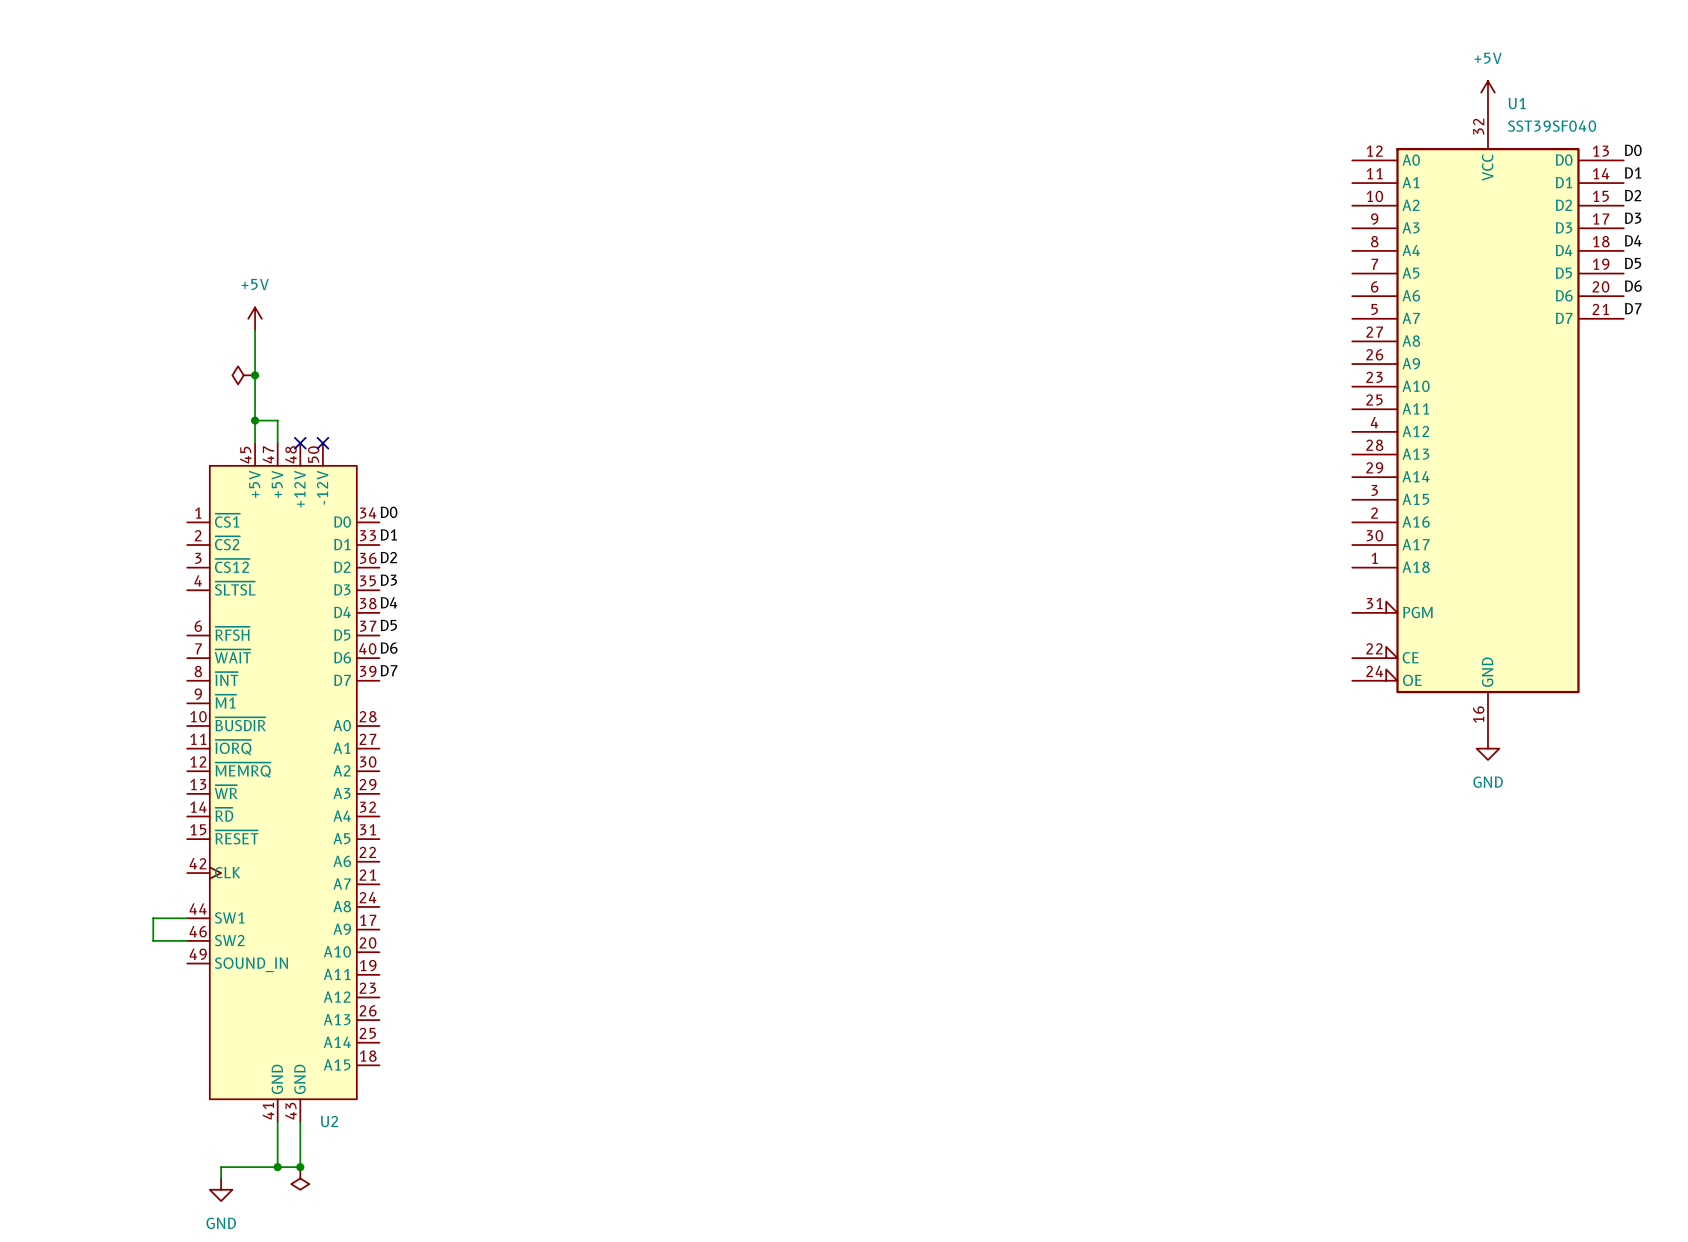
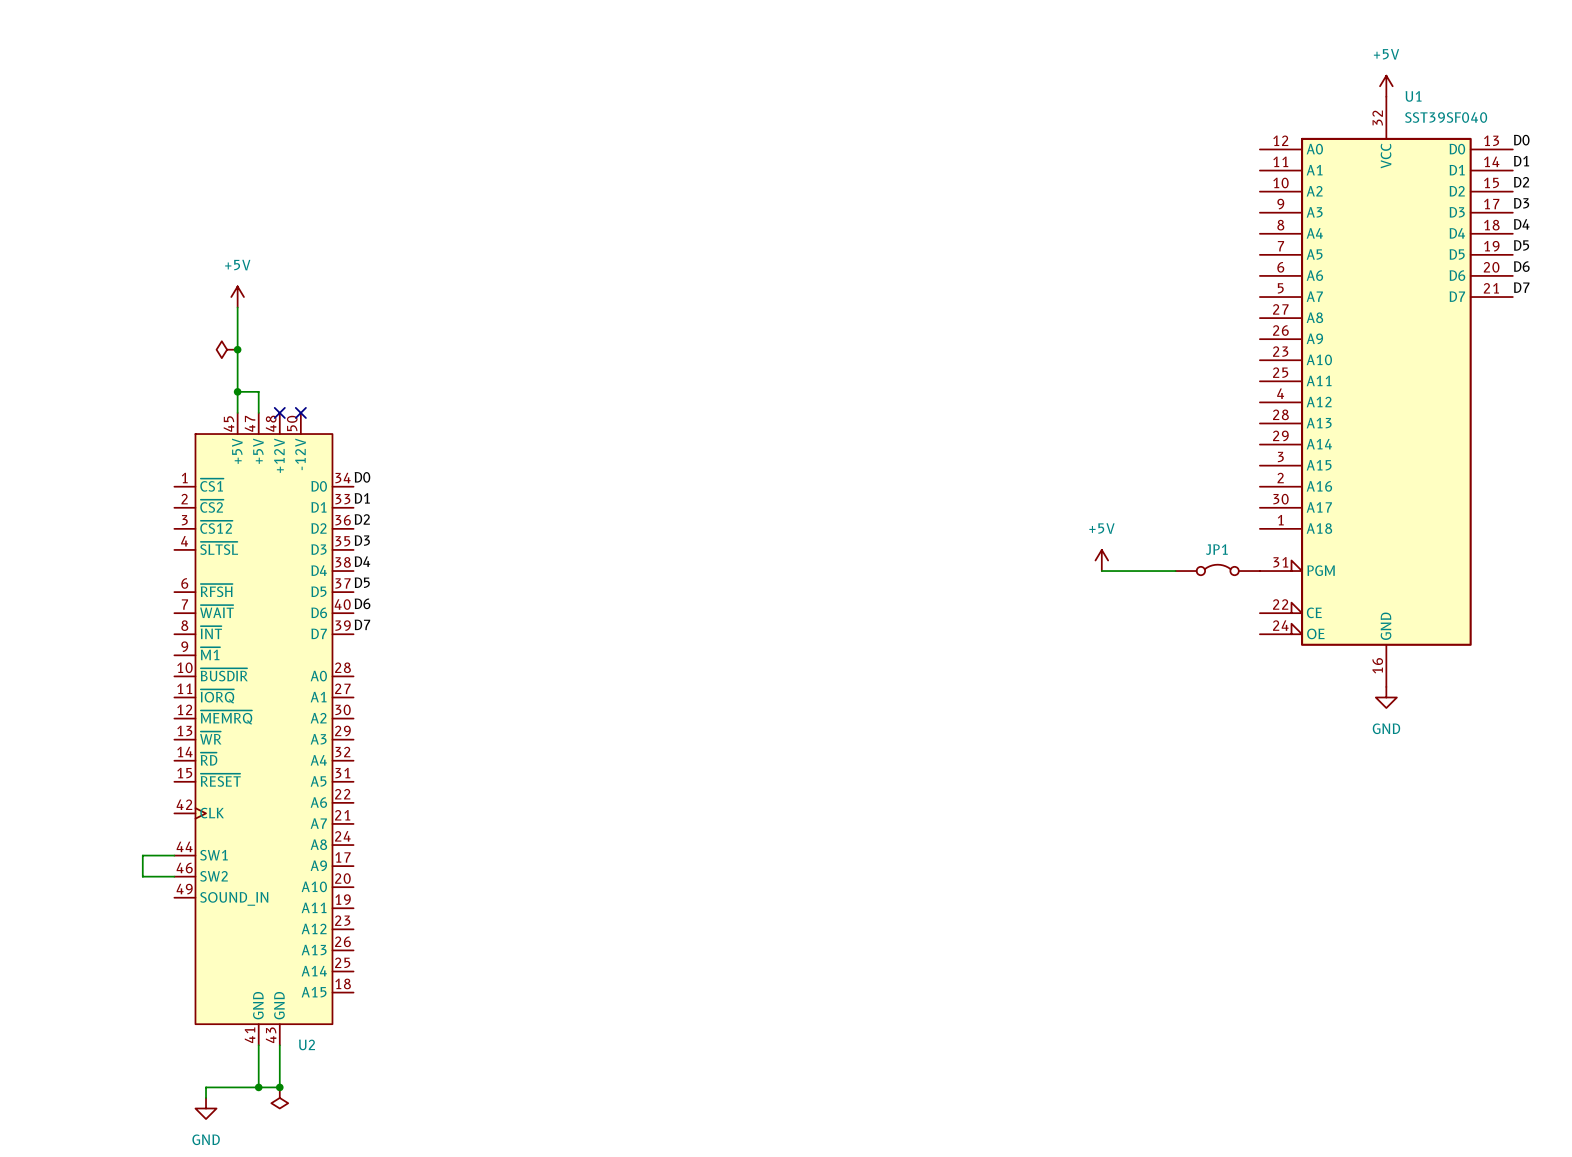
power symbol: none -> +5V (1101, 560)
JP1: none -> (1217, 569)
wire: none -> (1101, 571) (1175, 571)

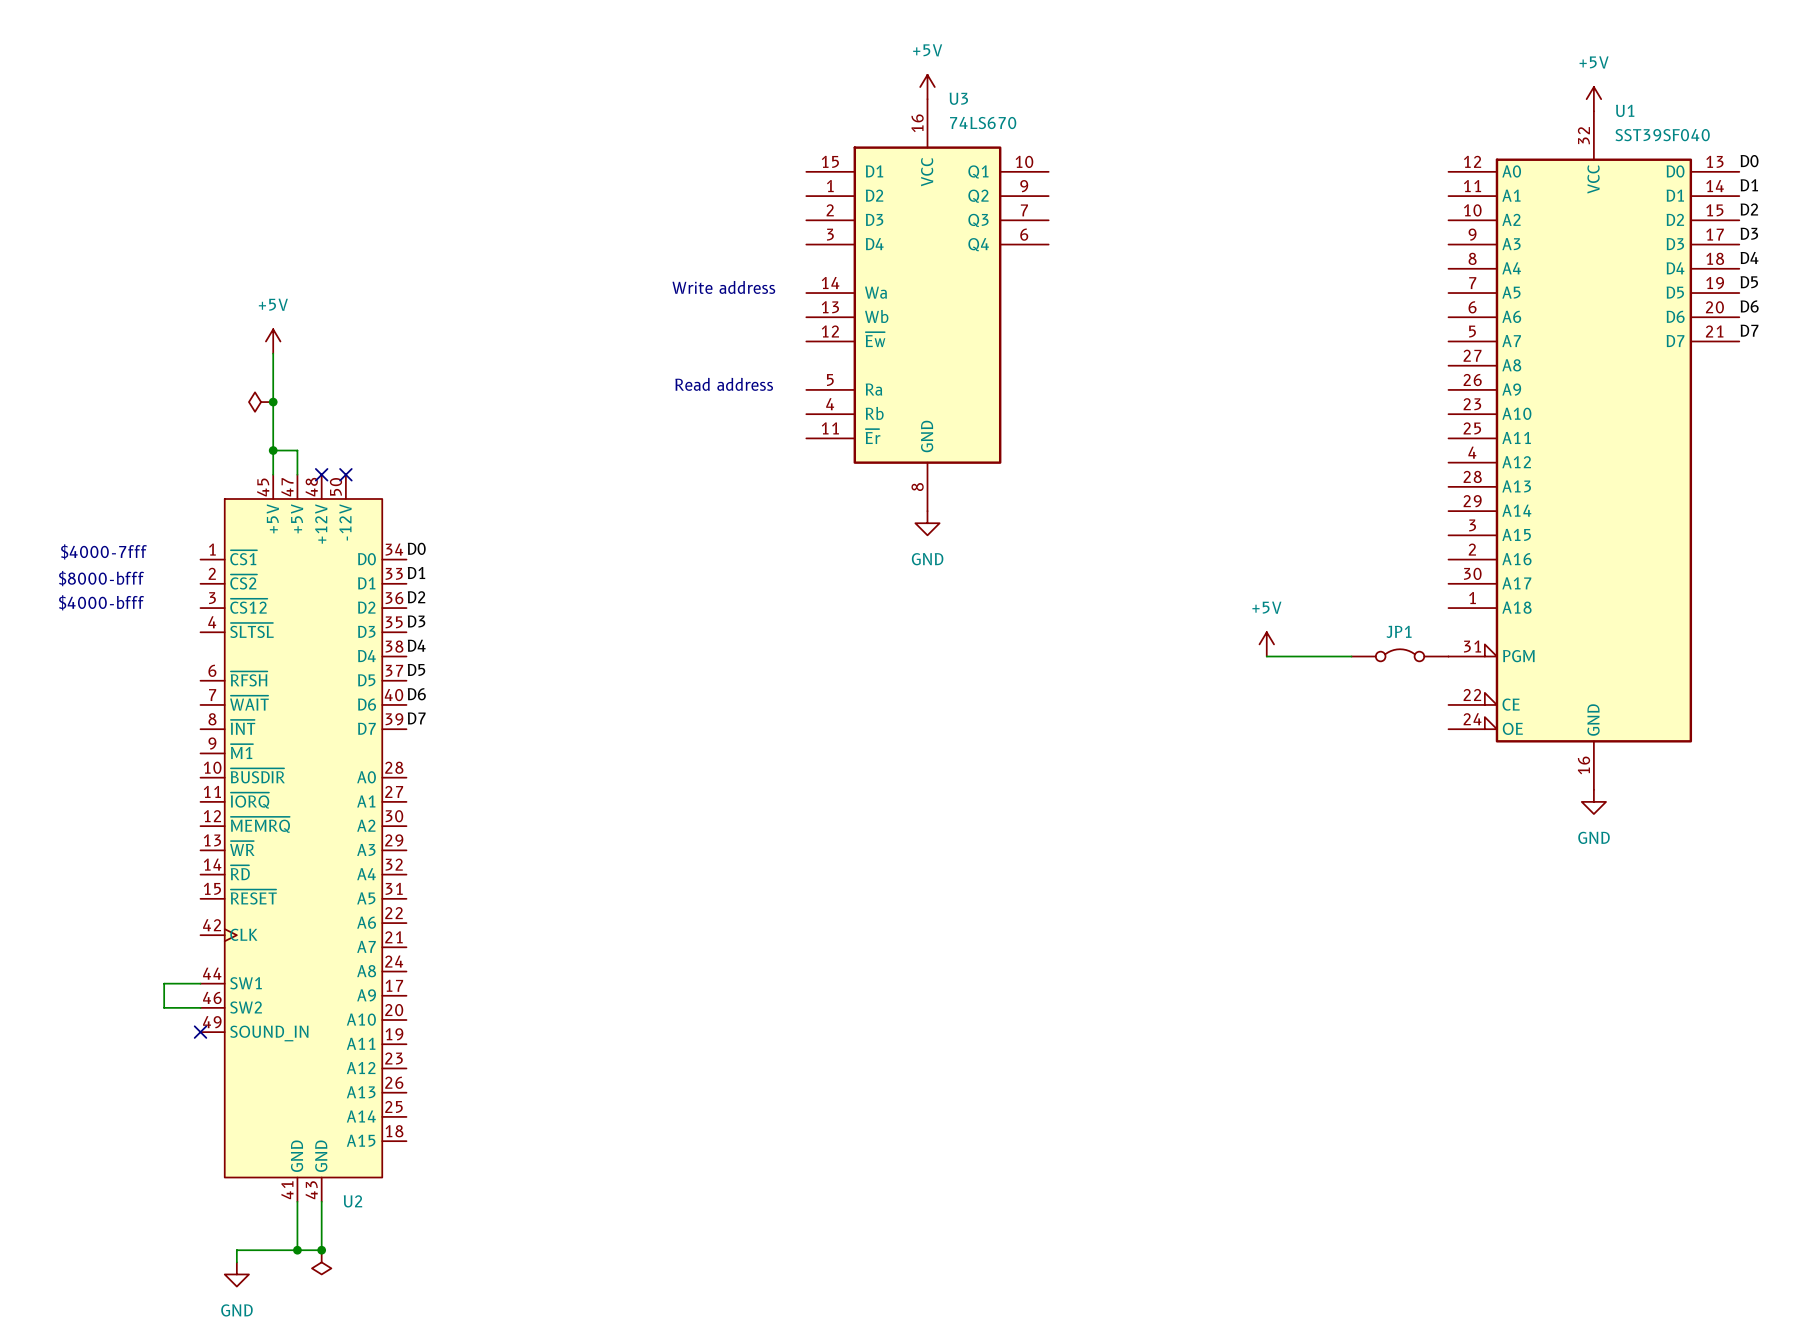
power symbol: none -> +5V (927, 87)
text: none -> Write address (723, 287)
U3: none -> 74LS670 (927, 305)
text: none -> Read address (724, 384)
power symbol: none -> GND (927, 523)
text: none -> $4000-7fff (103, 551)
text: none -> $8000-bfff (101, 578)
text: none -> $4000-bfff (101, 602)
no-connect mark: none -> (200, 1032)

